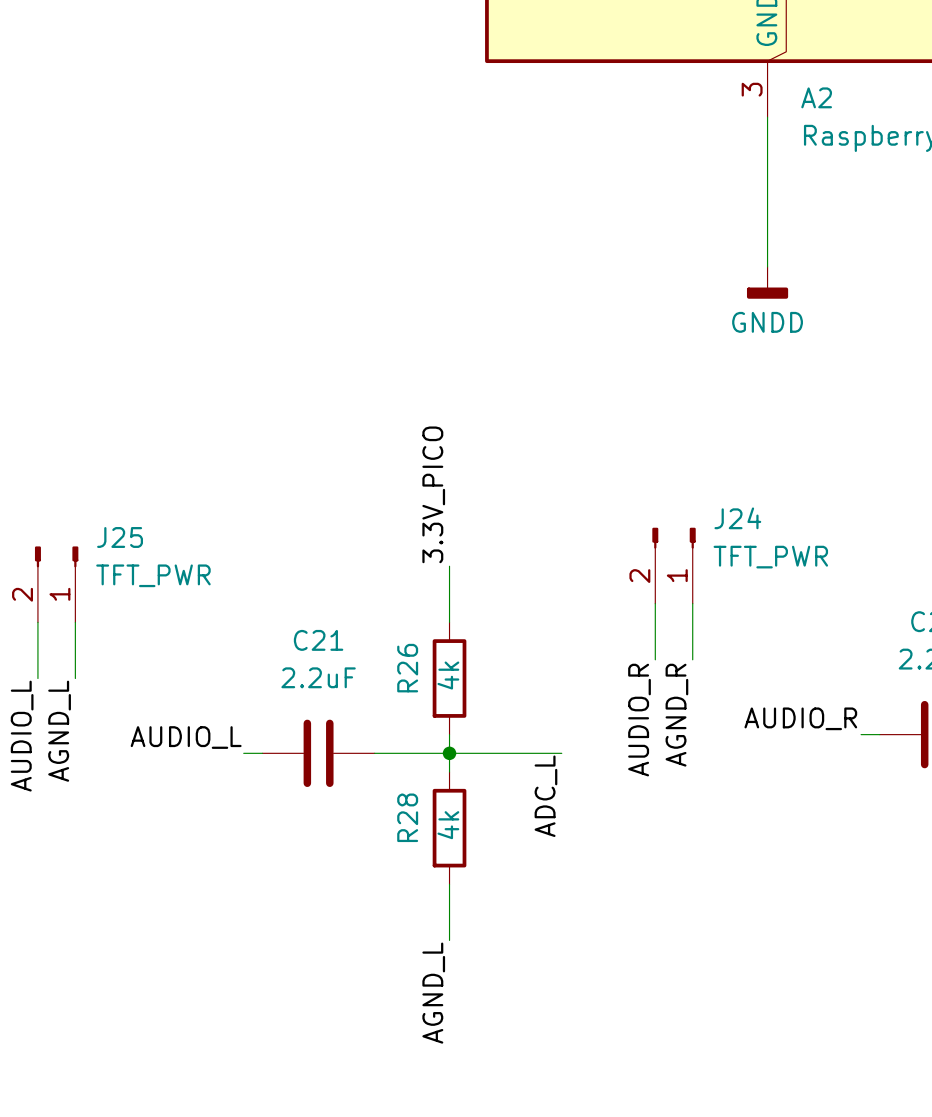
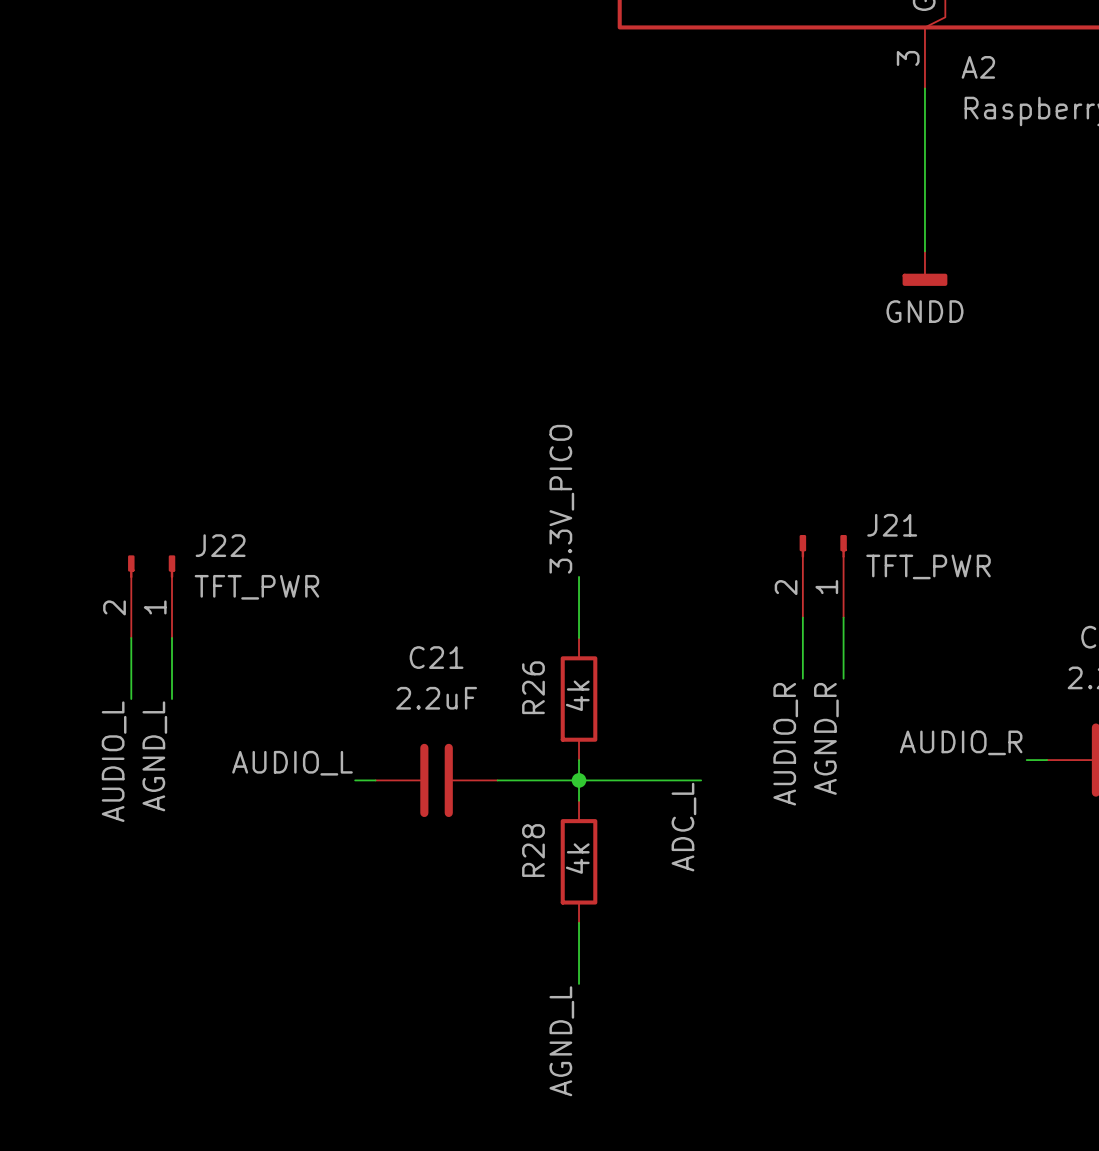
J24 name: J24 (737, 518) -> J21 (892, 525)
J25 name: J25 (120, 537) -> J22 (220, 545)

